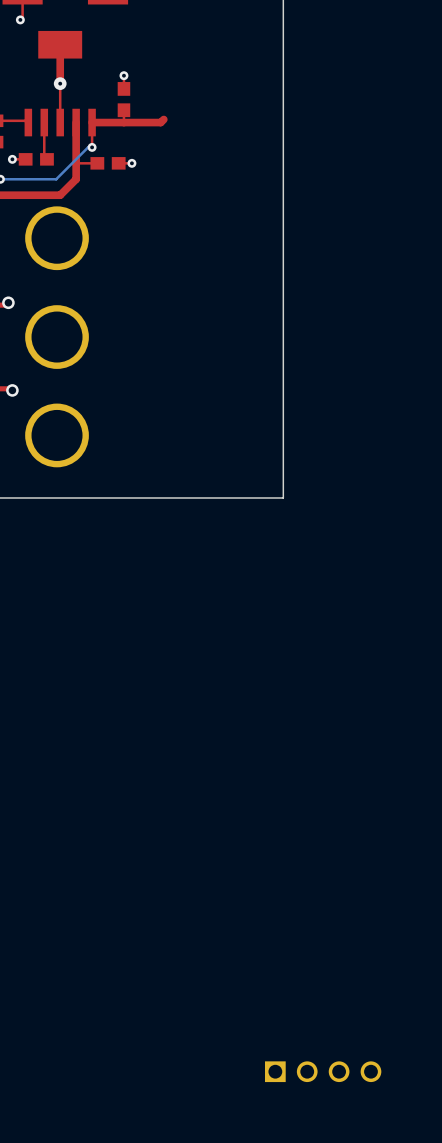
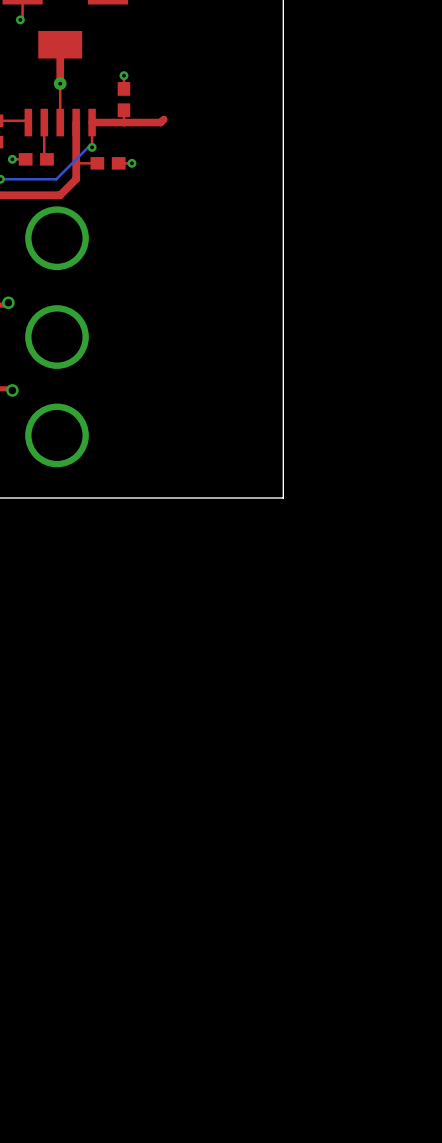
part: (323, 1071) -> none

